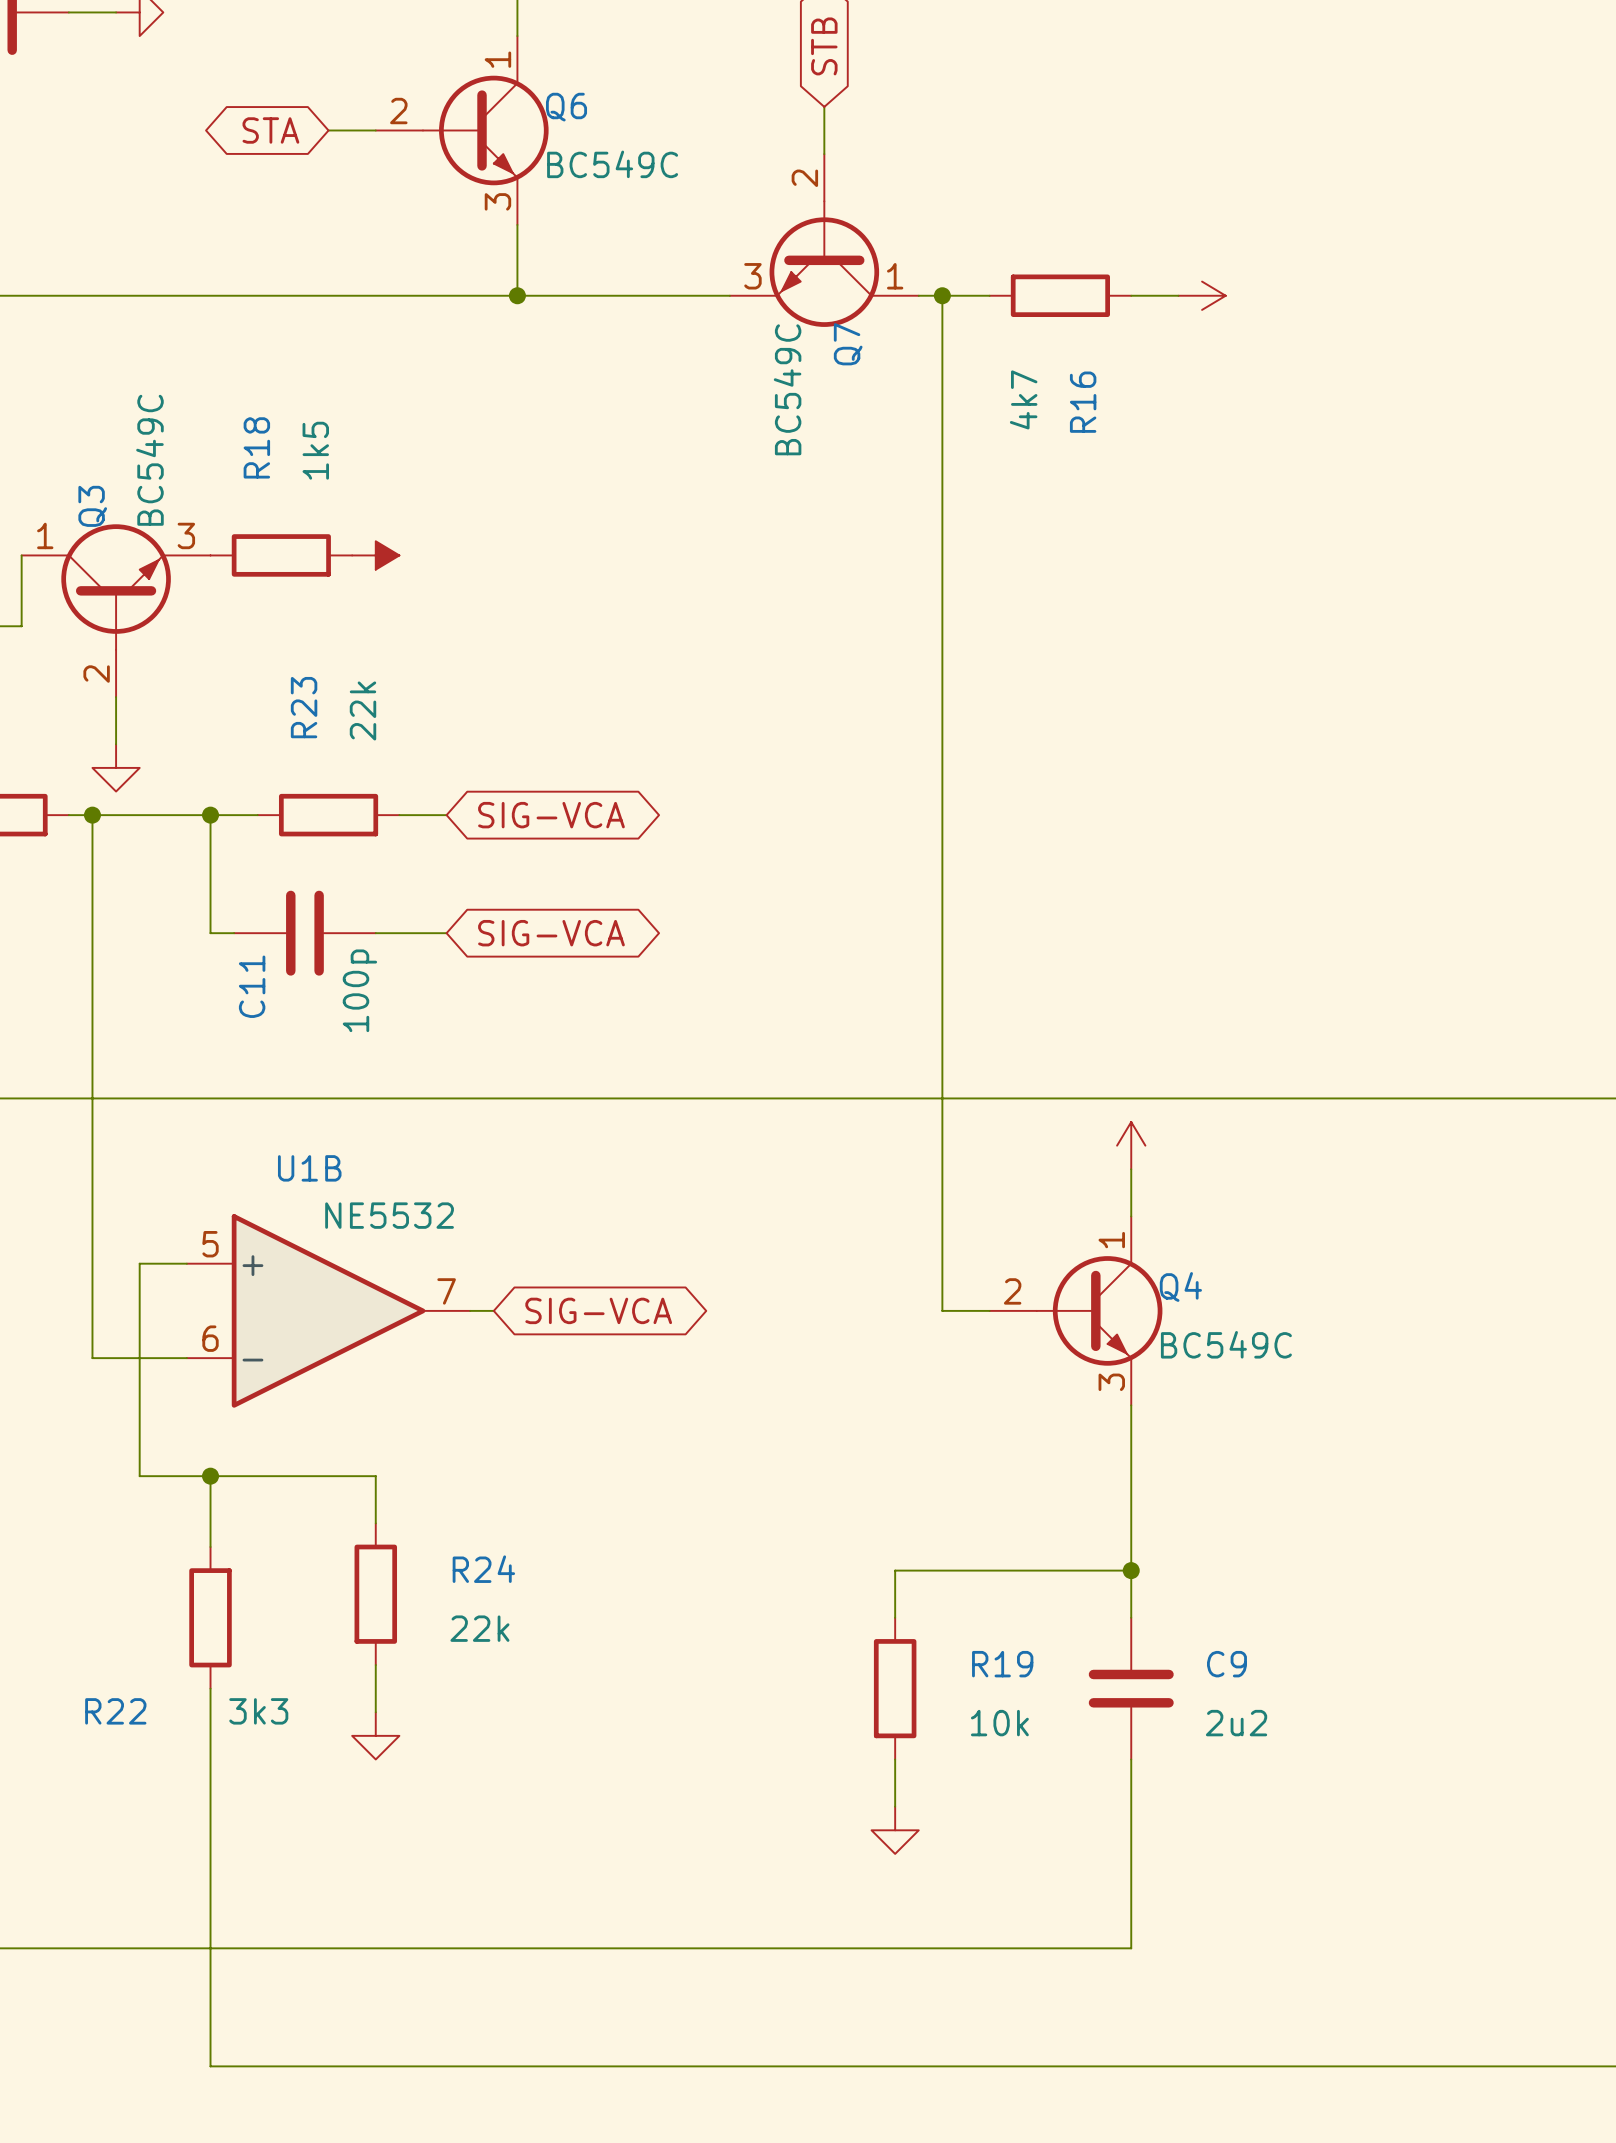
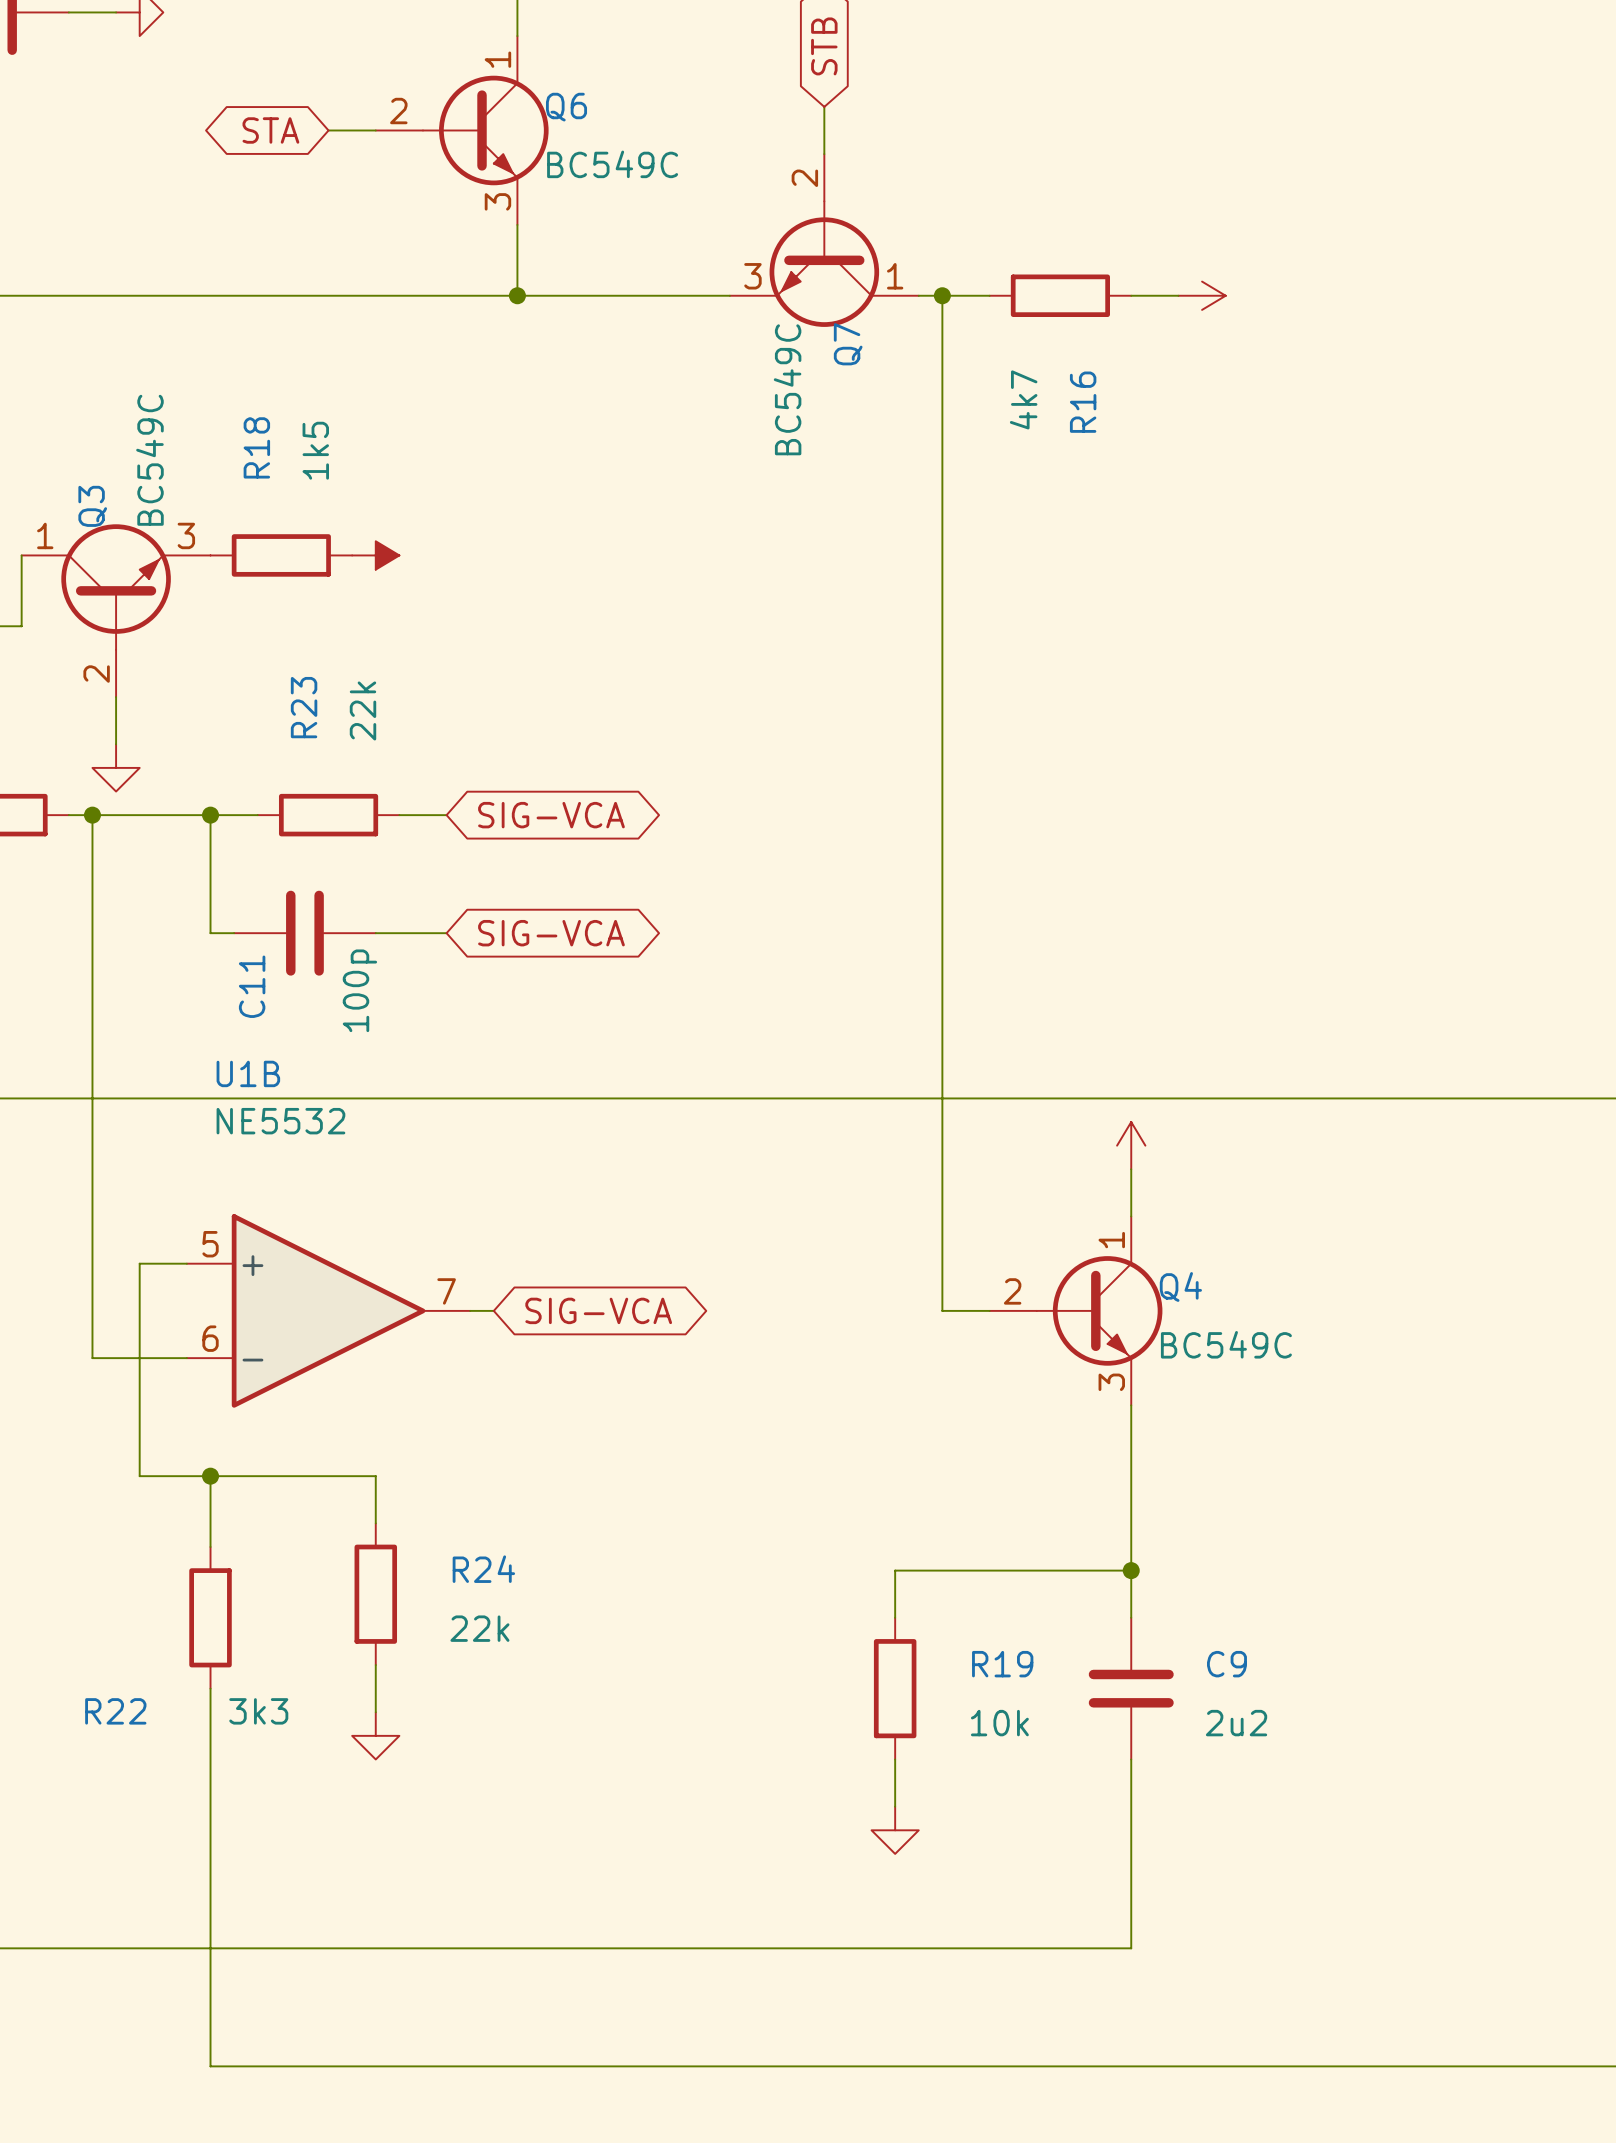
U1B name position: U1B (309, 1168) -> U1B (248, 1073)
U1B value position: NE5532 (389, 1215) -> NE5532 (280, 1121)

